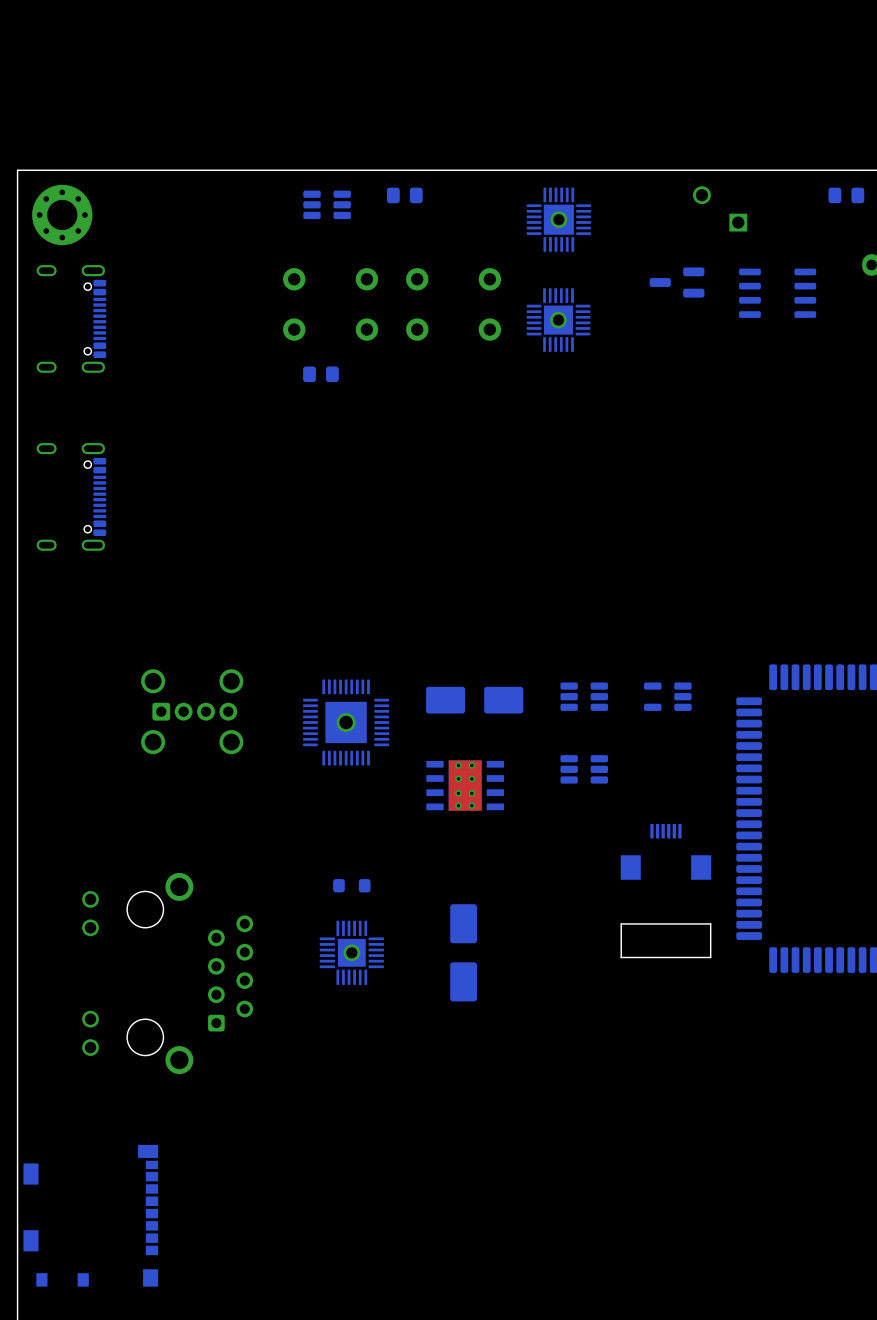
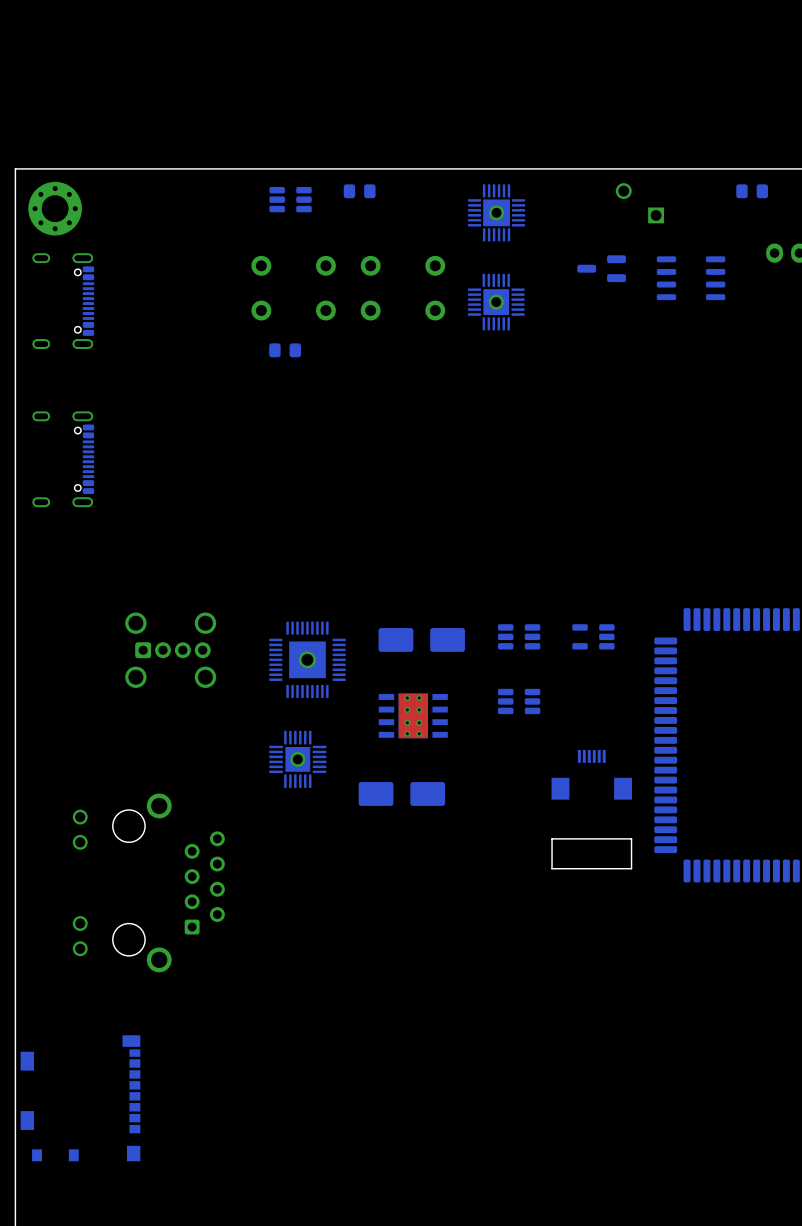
part: (351, 885) -> none
part position: (351, 952) -> (297, 759)
part rotation: 0° (463, 952) -> 90° clockwise (401, 793)
part position: (463, 952) -> (401, 793)

